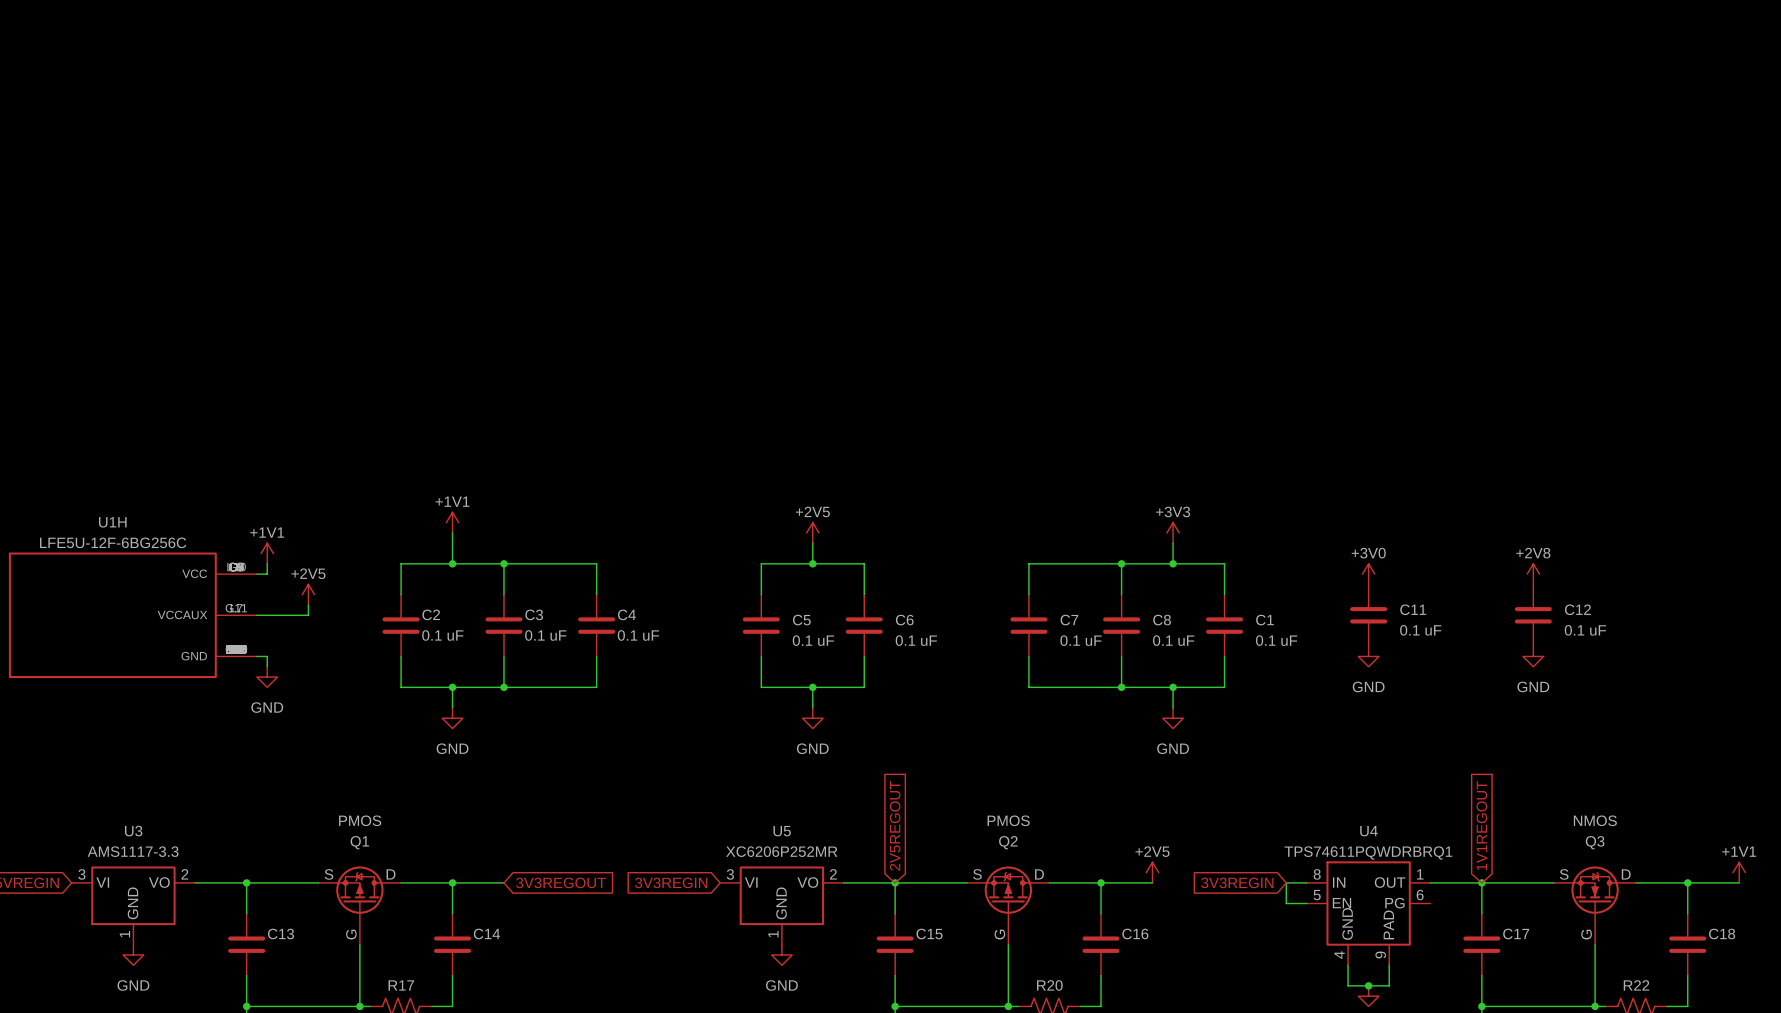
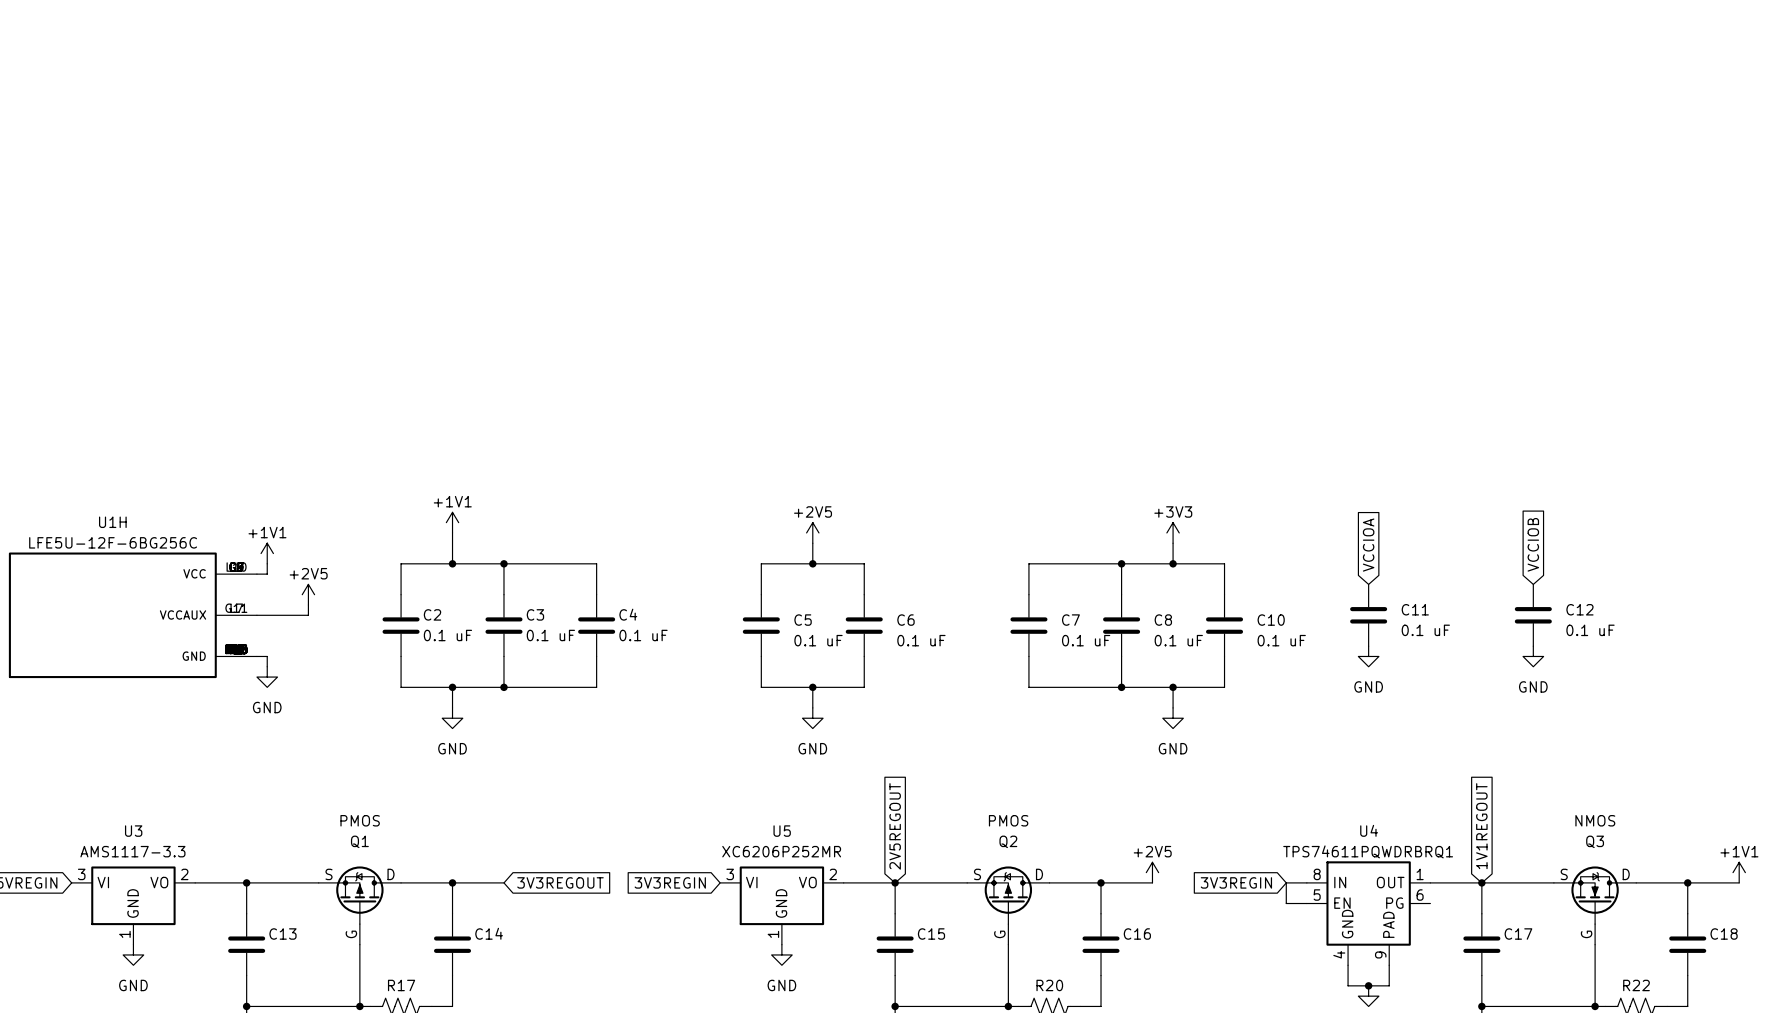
global label: none -> VCCIOA (1368, 545)
global label: none -> VCCIOB (1533, 544)
power symbol: +3V0 (1368, 574) -> none
power symbol: +2V8 (1533, 574) -> none
C1 name: C1 (1264, 620) -> C10 (1271, 620)

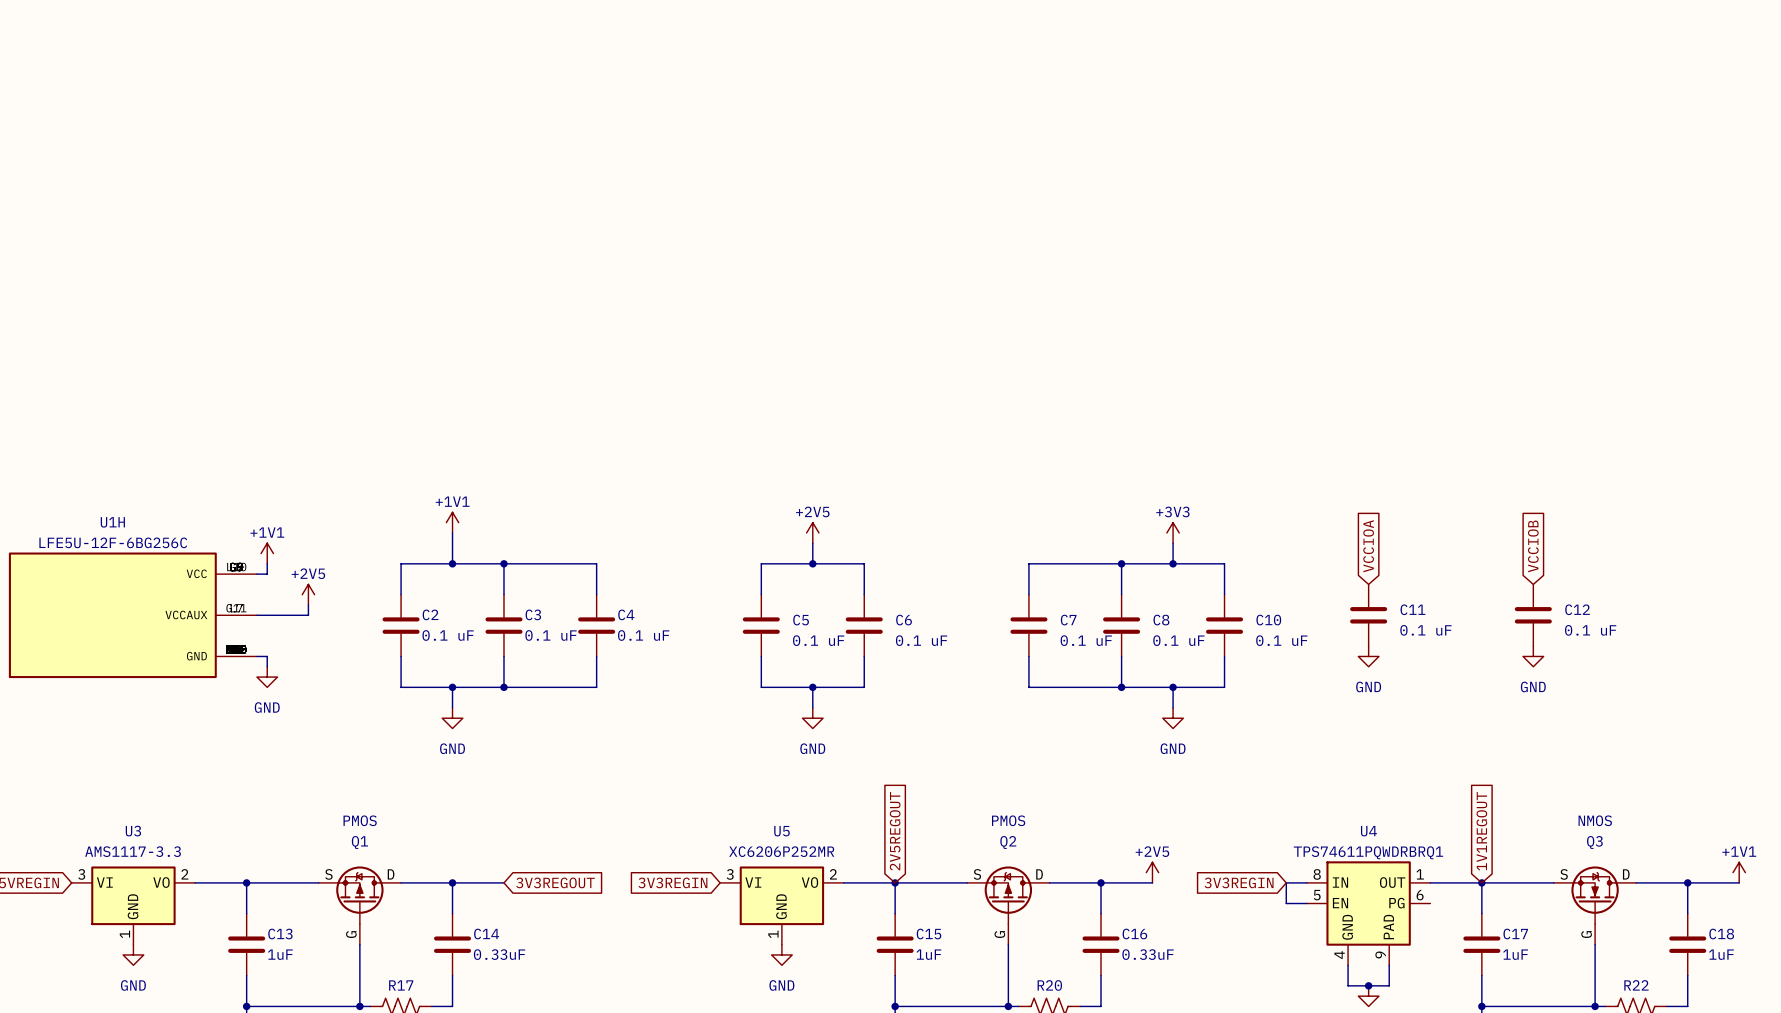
C13 value: none -> 1uF (280, 954)
C14 value: none -> 0.33uF (499, 954)
C15 value: none -> 1uF (928, 954)
C16 value: none -> 0.33uF (1148, 954)
C17 value: none -> 1uF (1515, 954)
C18 value: none -> 1uF (1721, 954)

